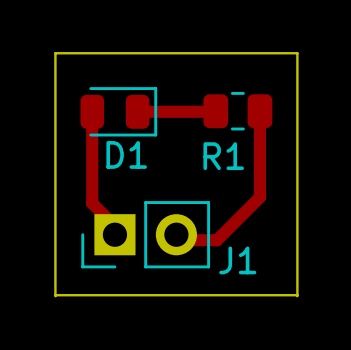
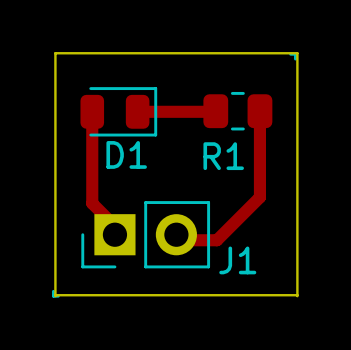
line: none -> (290, 54) (295, 54) (295, 59)
line: none -> (53, 291) (53, 296) (58, 296)

